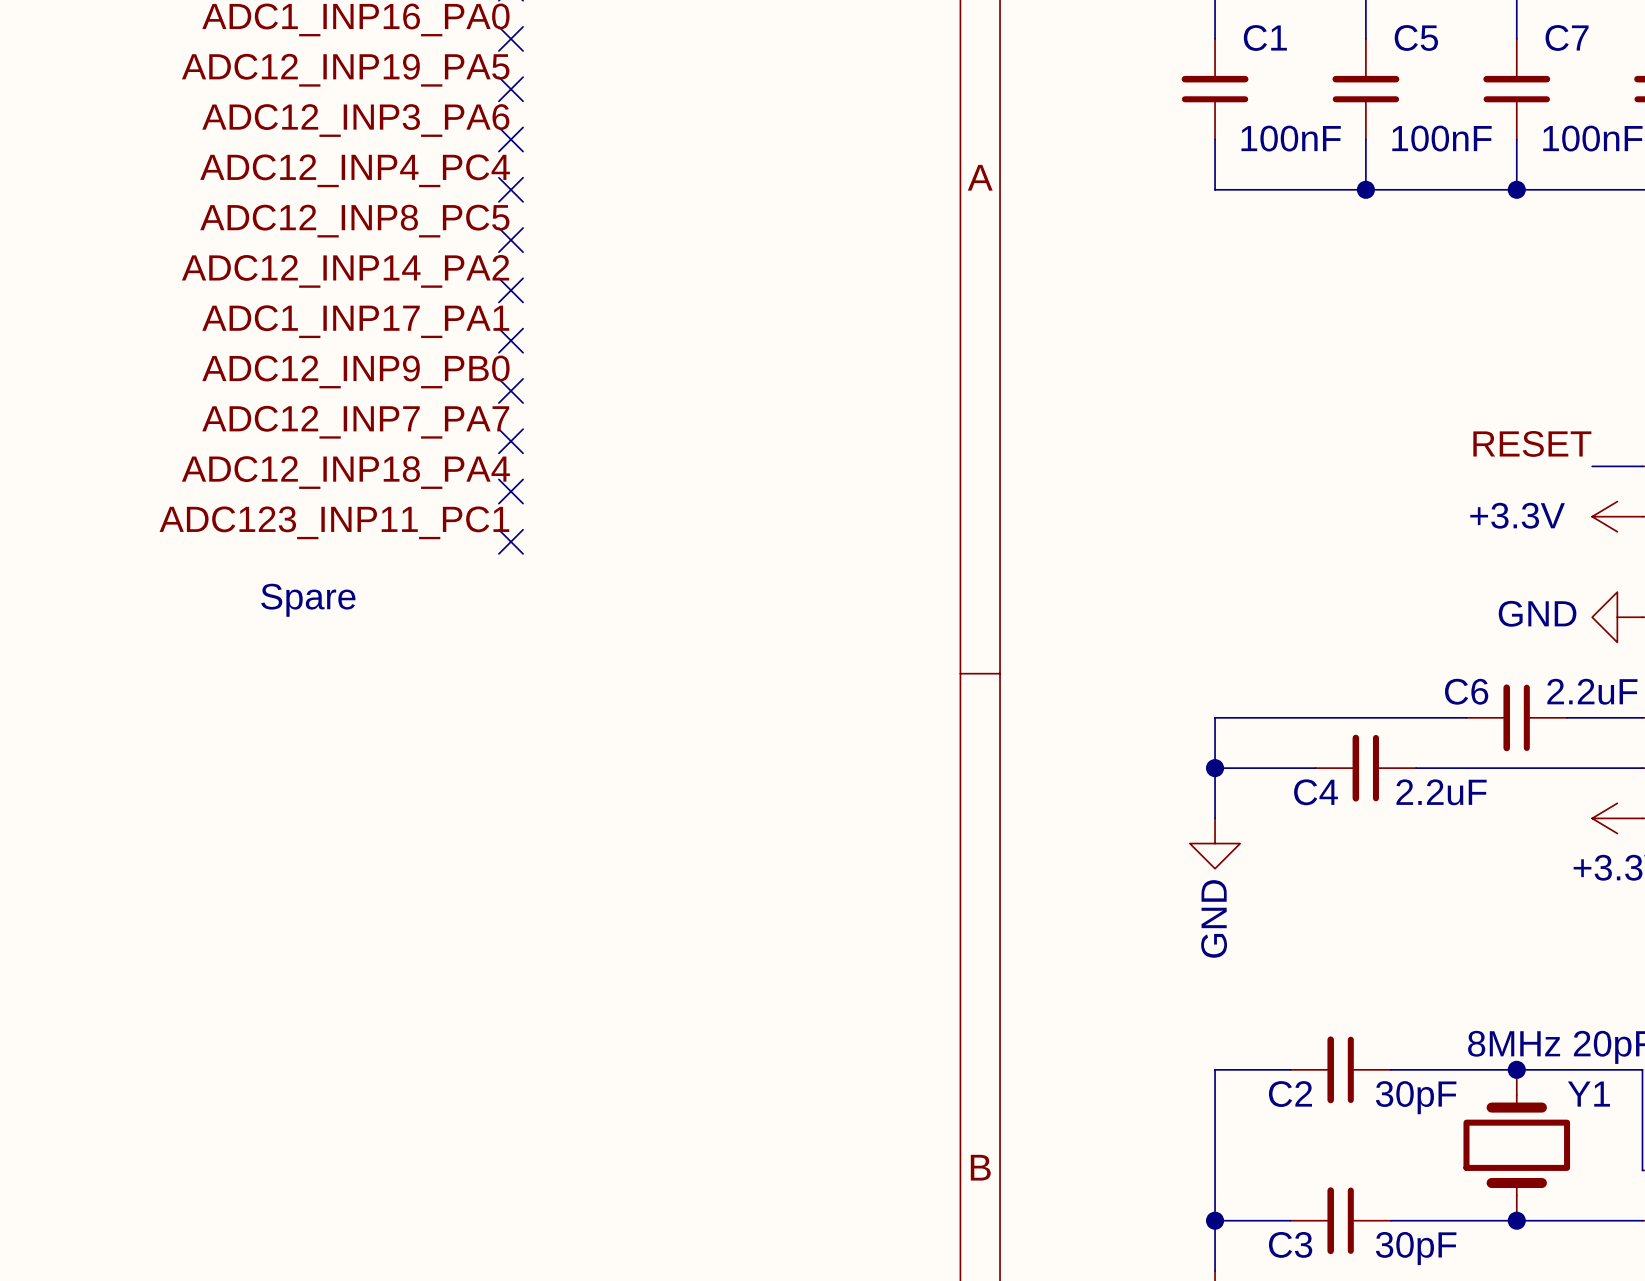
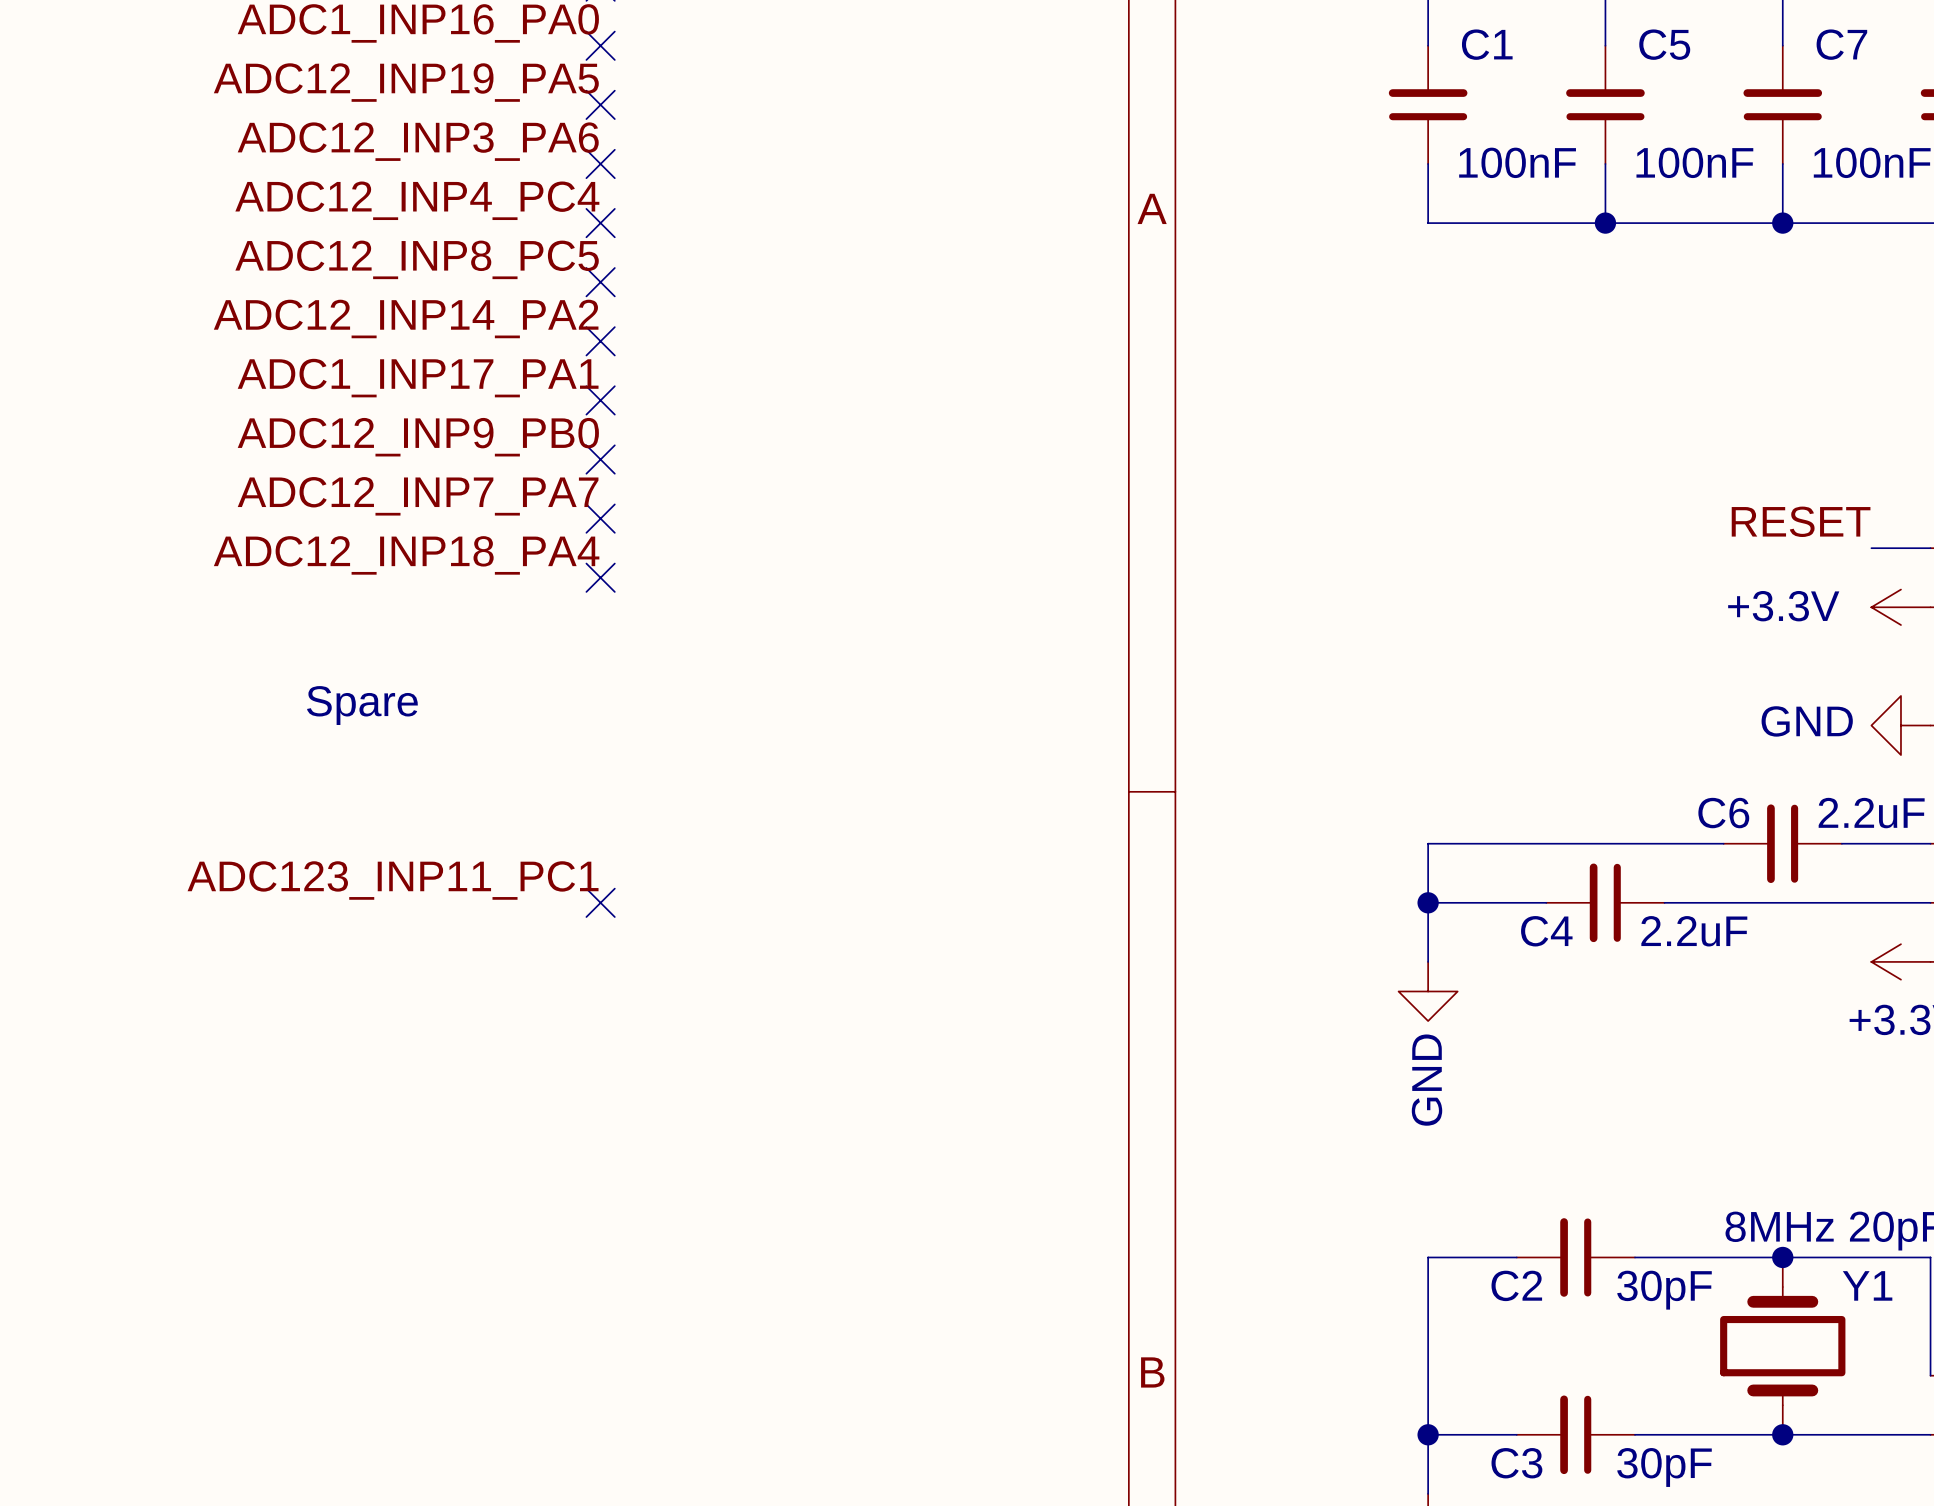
label position: ADC123_INP11_PC1 (334, 522) -> ADC123_INP11_PC1 (393, 880)
no-connect mark: (511, 541) -> none
no-connect mark: none -> (600, 902)

